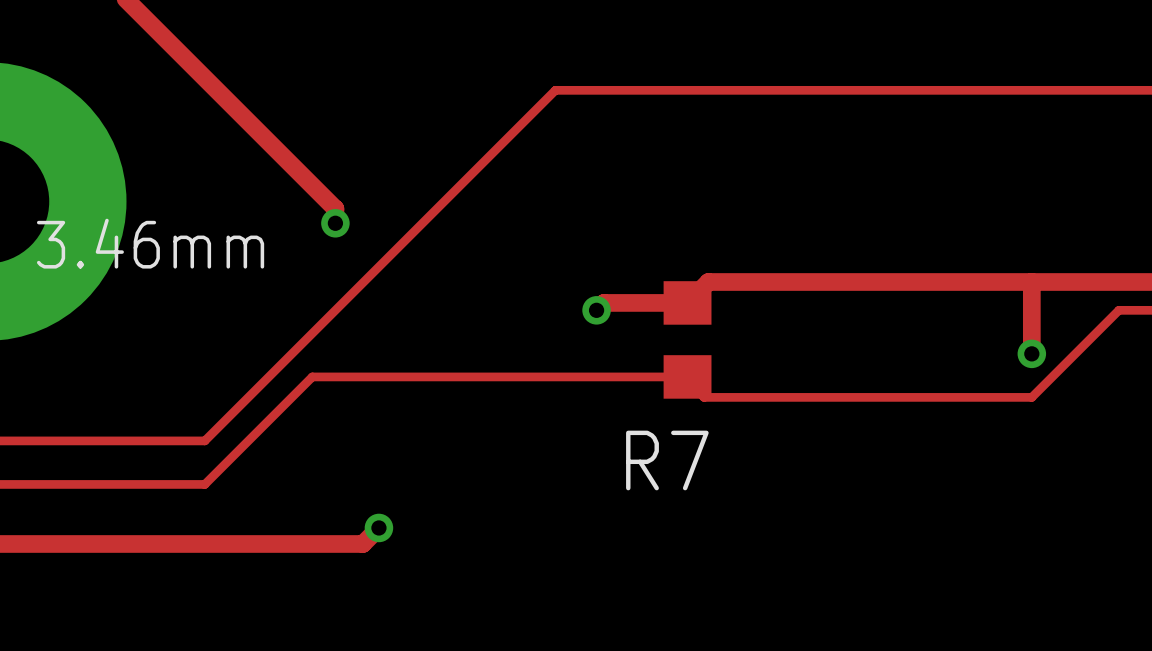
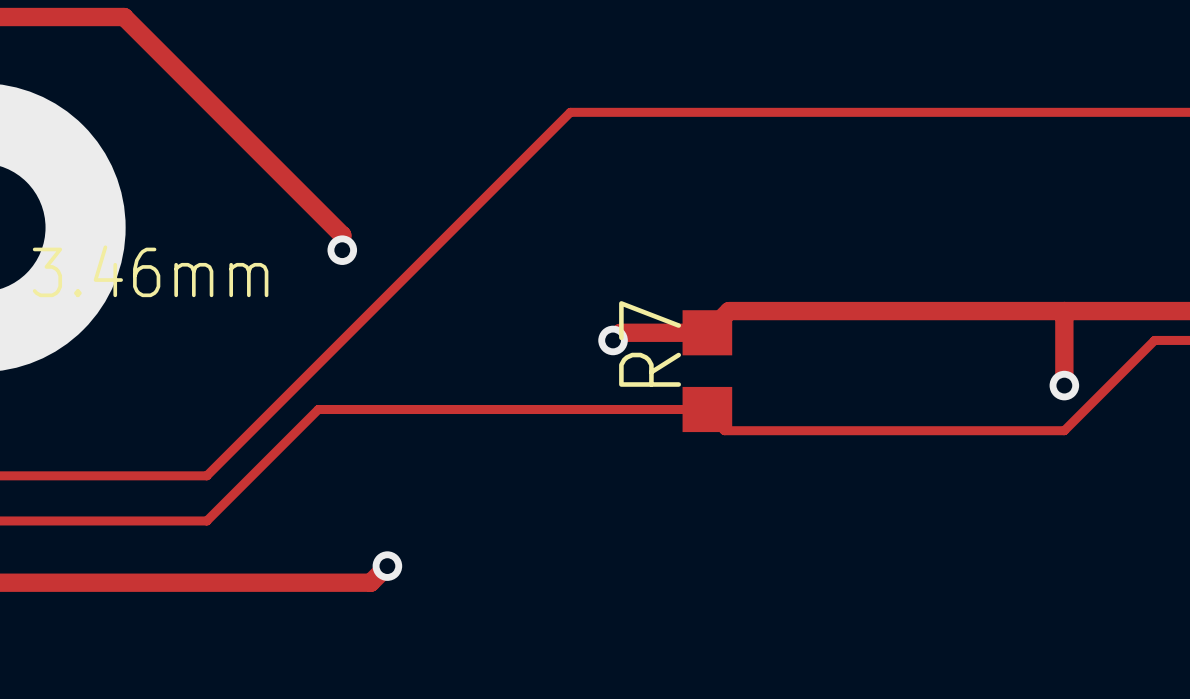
R7 name rotation: 0° (667, 460) -> 90° counterclockwise (650, 343)
R7 name position: R7 (667, 460) -> R7 (650, 343)

